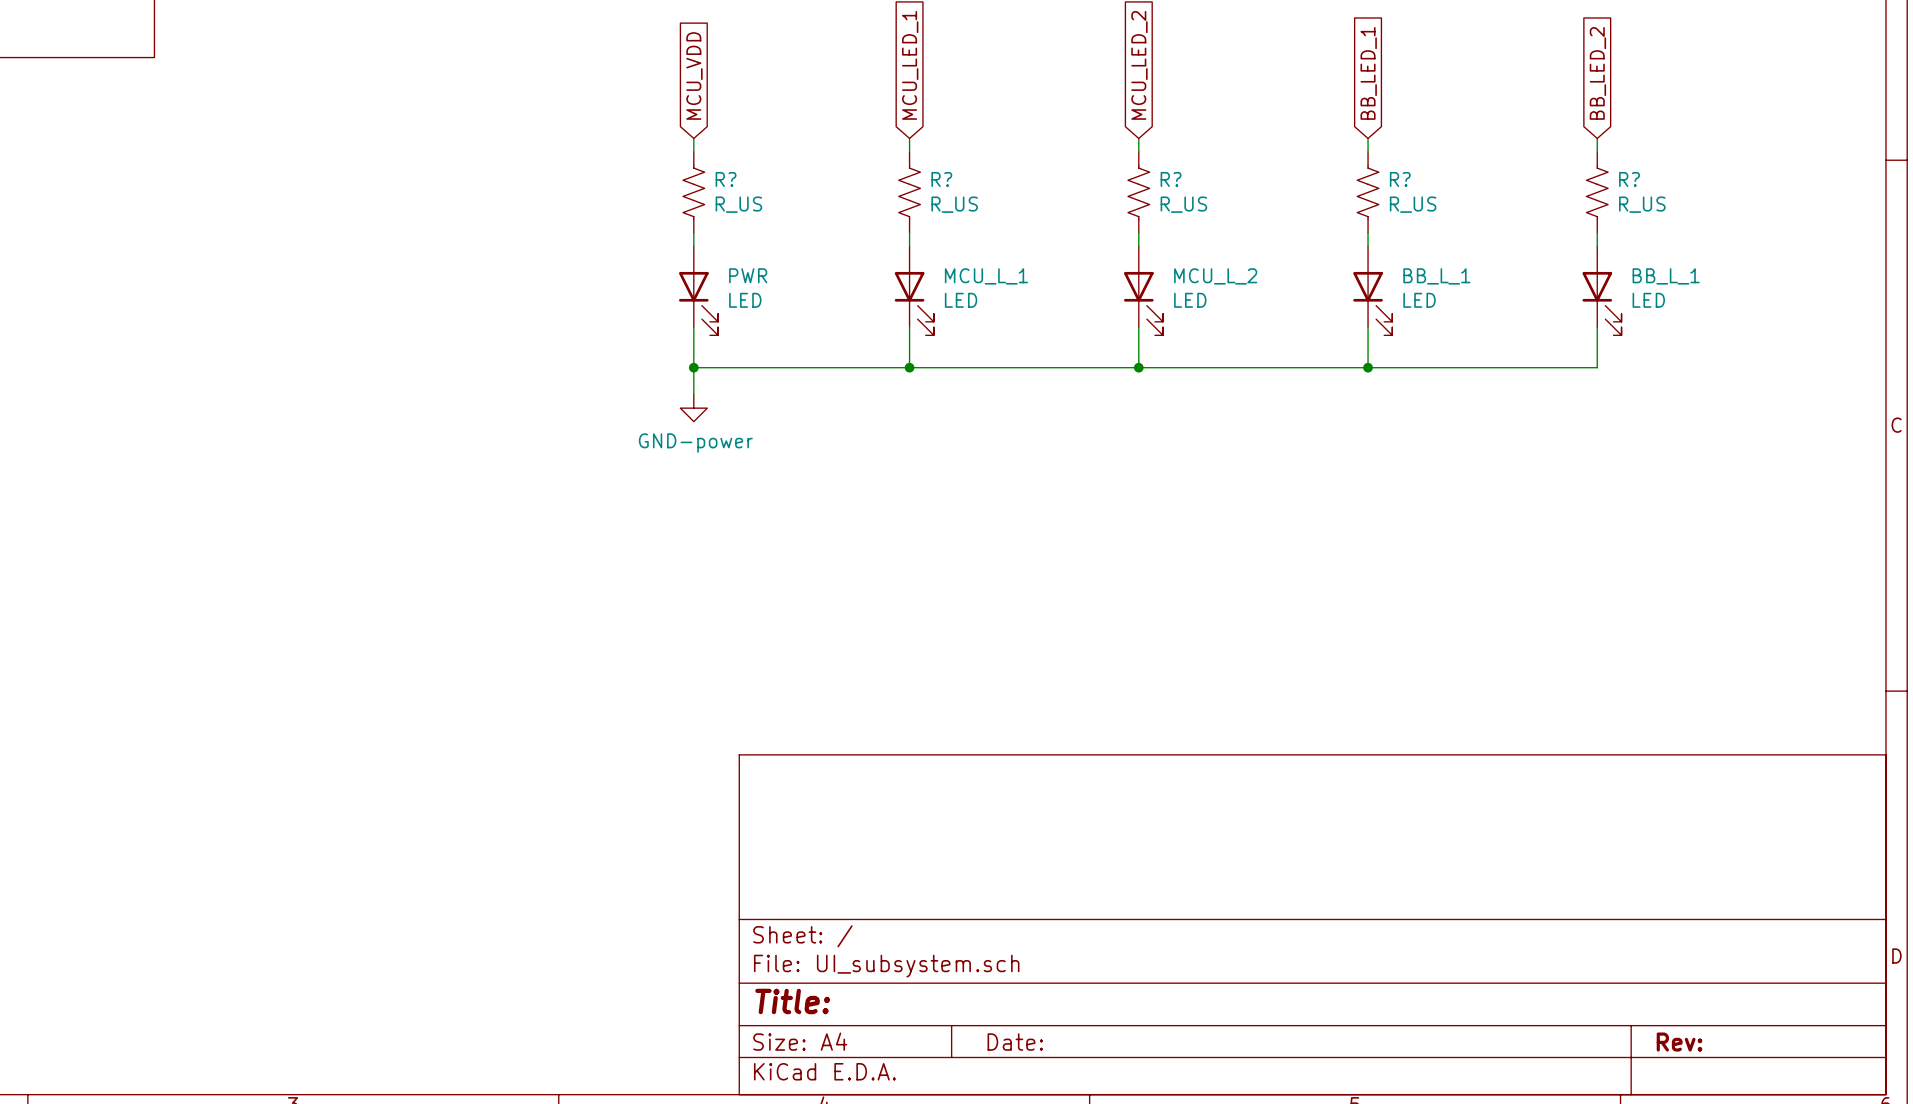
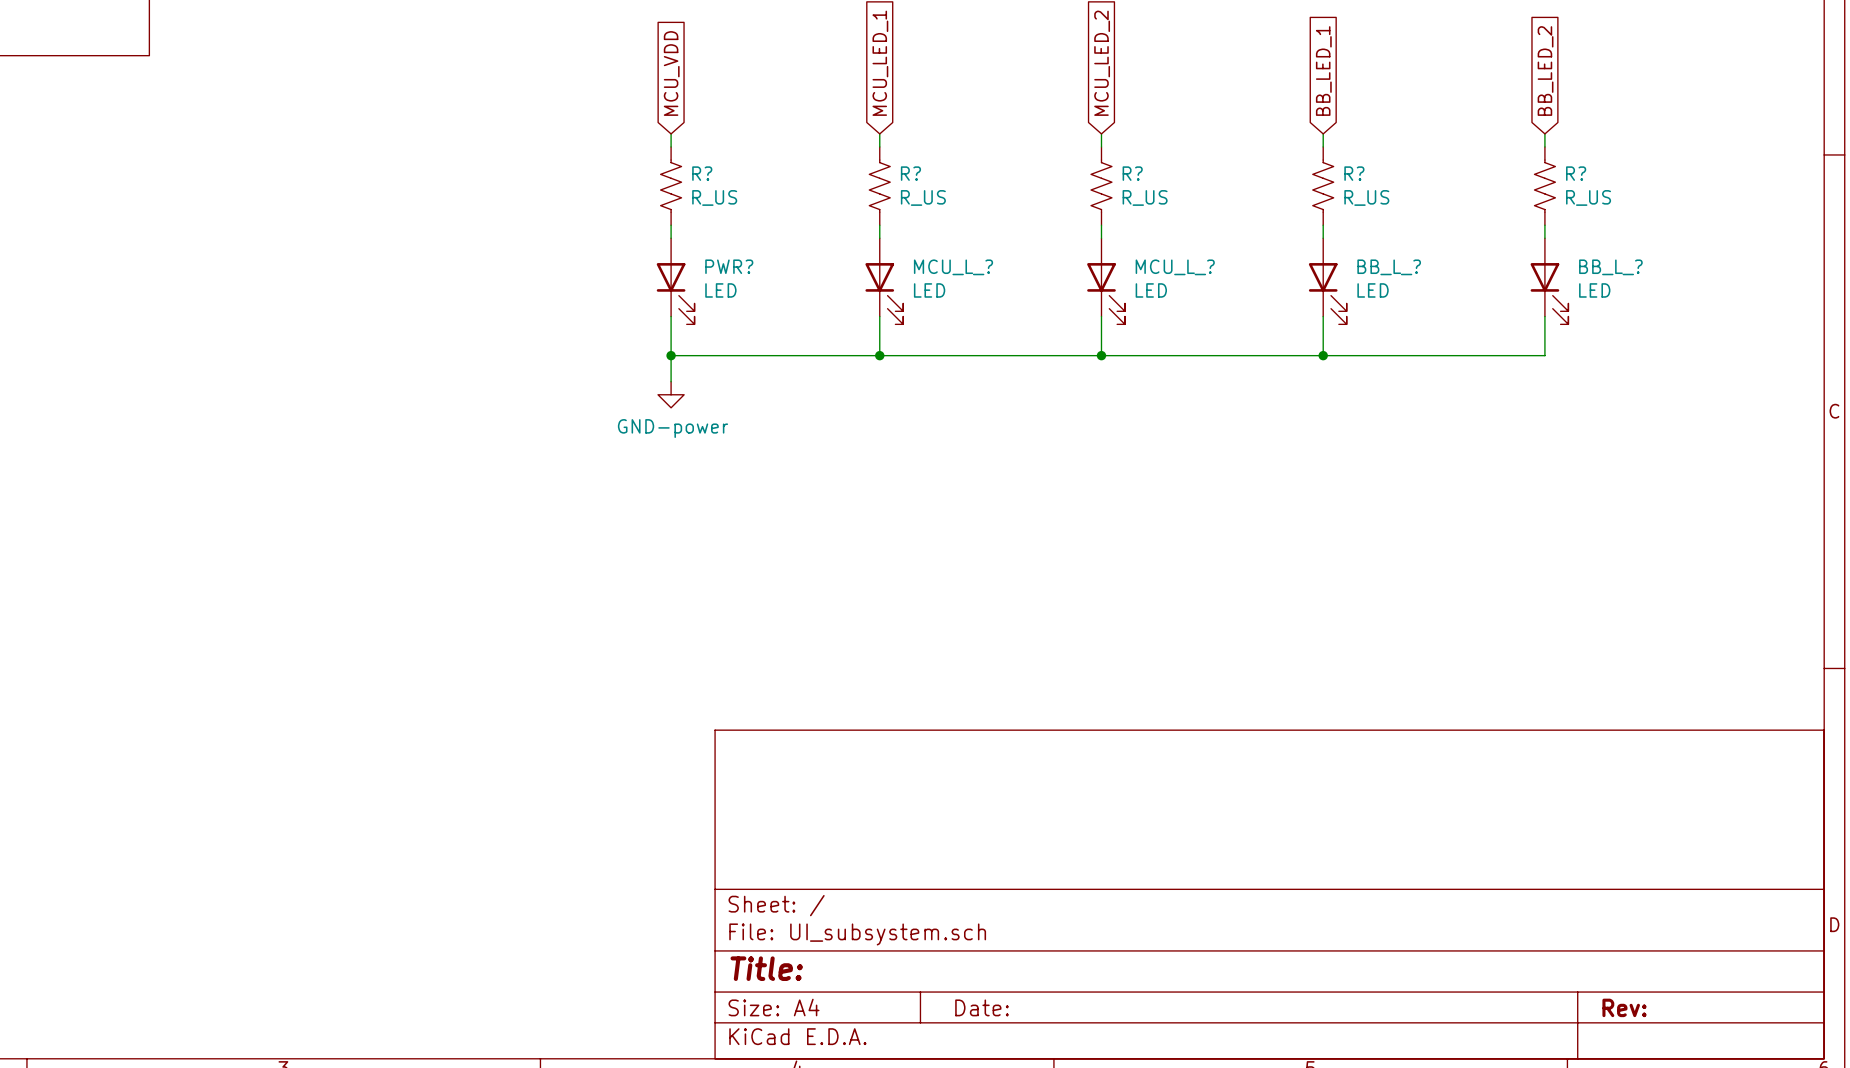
PWR name: PWR (748, 275) -> PWR? (729, 266)
MCU_L_1 name: MCU_L_1 (986, 276) -> MCU_L_? (953, 267)
MCU_L_2 name: MCU_L_2 (1215, 276) -> MCU_L_? (1175, 267)
BB_L_1 name: BB_L_1 (1436, 276) -> BB_L_? (1389, 267)
BB_L_1 name: BB_L_1 (1666, 276) -> BB_L_? (1610, 267)

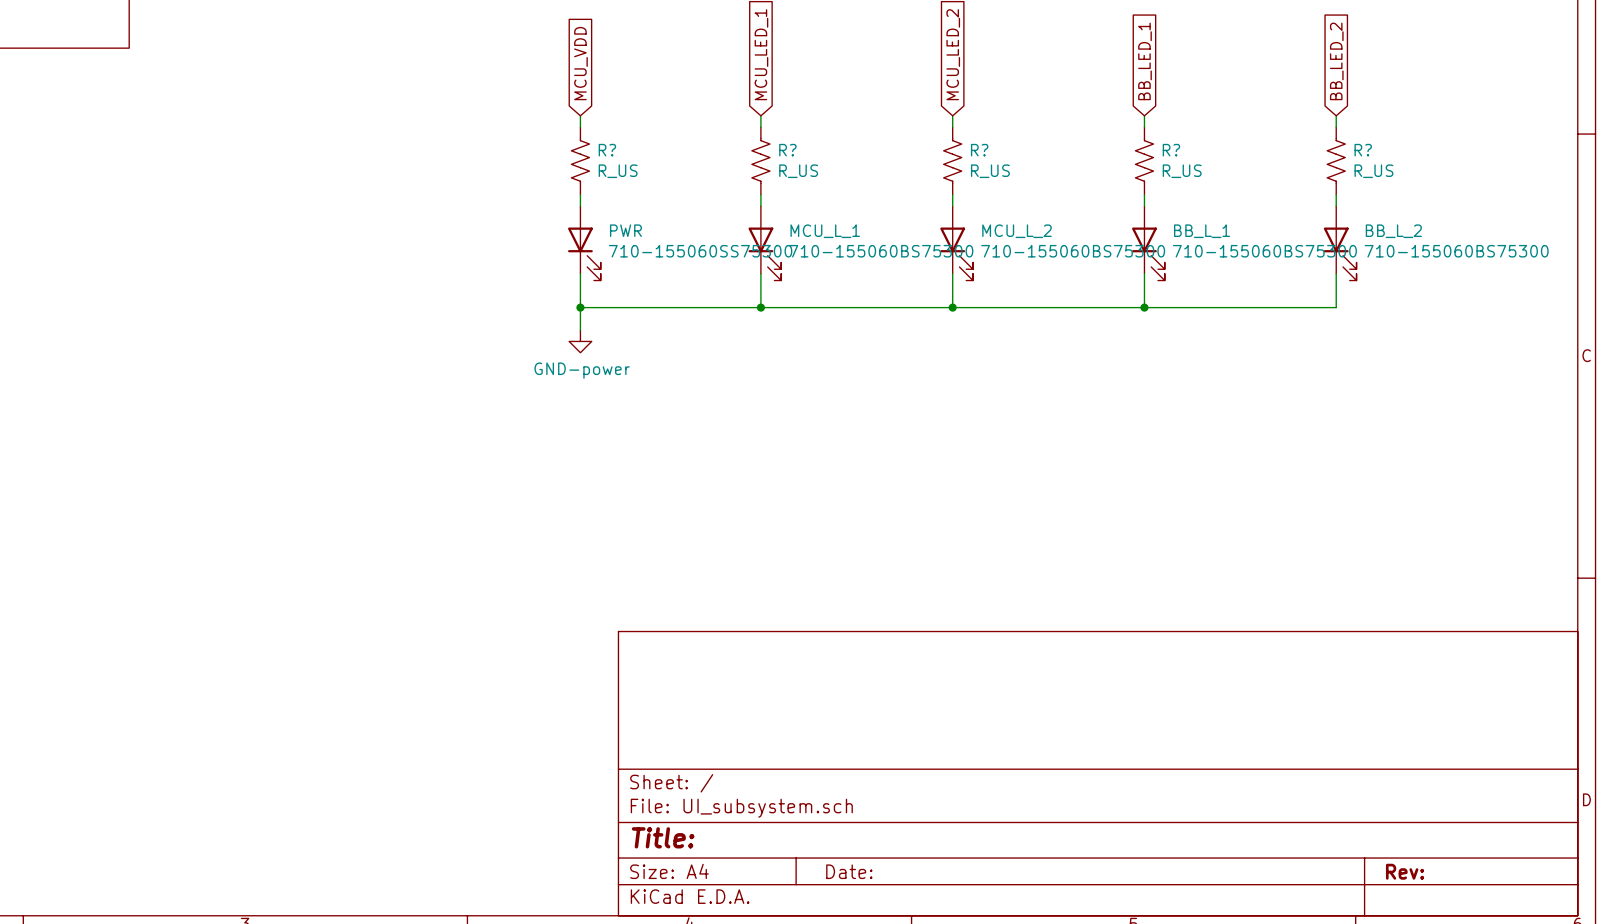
PWR? name: PWR? (729, 266) -> PWR (625, 230)
MCU_L_? name: MCU_L_? (953, 267) -> MCU_L_1 (825, 231)
MCU_L_? name: MCU_L_? (1175, 267) -> MCU_L_2 (1017, 231)
BB_L_? name: BB_L_? (1389, 267) -> BB_L_1 (1202, 231)
BB_L_? name: BB_L_? (1610, 267) -> BB_L_2 (1393, 231)
PWR? value: LED (720, 290) -> 710-155060SS75300 (700, 251)
MCU_L_? value: LED (929, 290) -> 710-155060BS75300 (881, 251)
MCU_L_? value: LED (1151, 290) -> 710-155060BS75300 (1073, 251)
BB_L_? value: LED (1373, 290) -> 710-155060BS75300 (1264, 251)
BB_L_? value: LED (1594, 290) -> 710-155060BS75300 (1456, 251)

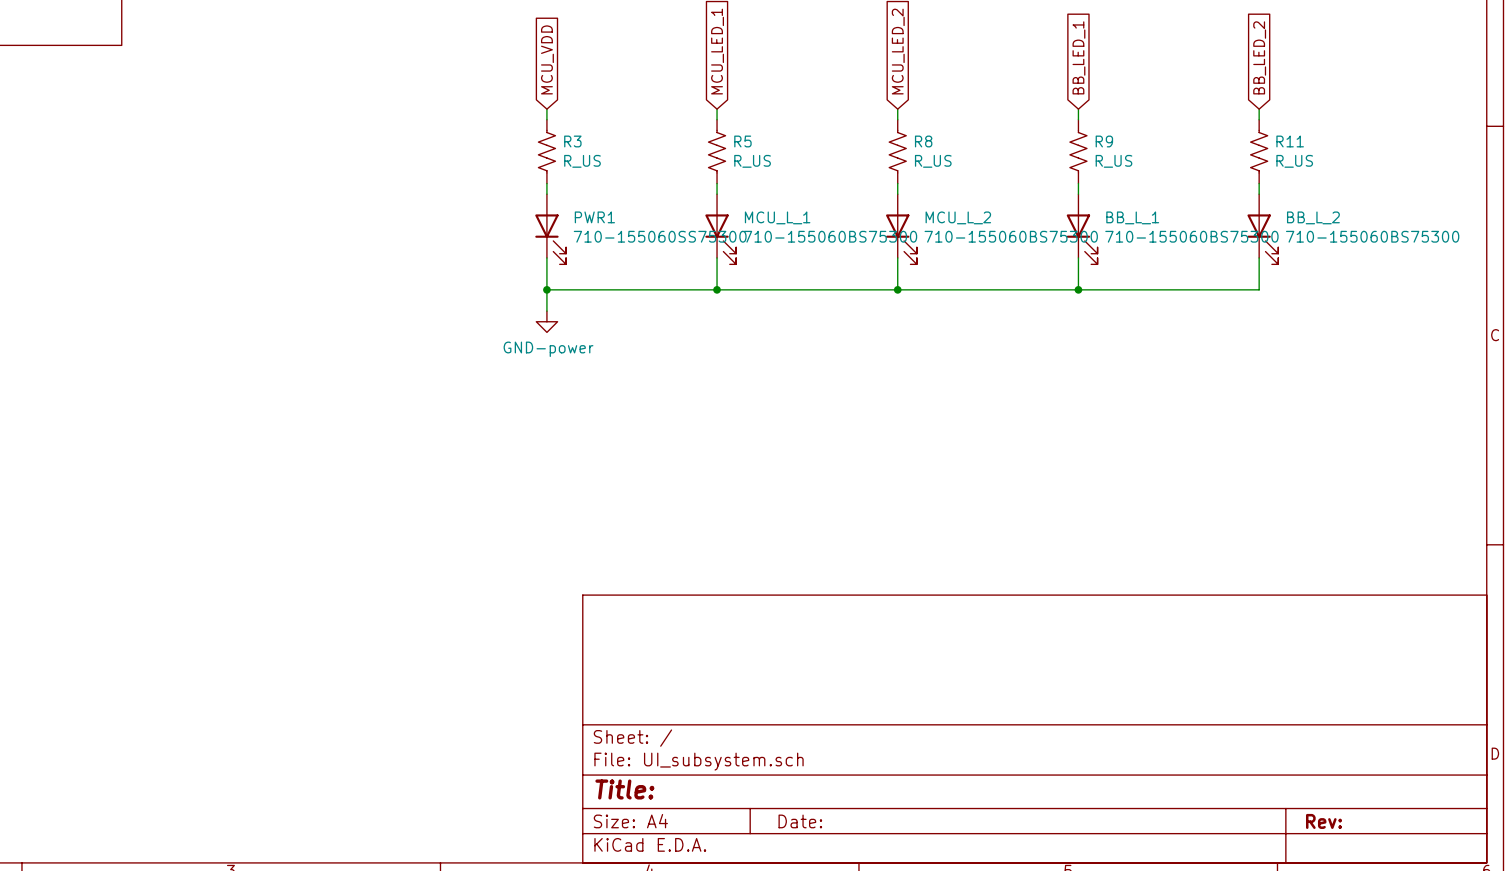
R? name: R? (607, 150) -> R3 (572, 141)
R? name: R? (787, 150) -> R5 (742, 141)
R? name: R? (979, 150) -> R8 (923, 141)
R? name: R? (1171, 150) -> R9 (1104, 141)
R? name: R? (1363, 150) -> R11 (1290, 141)
PWR name: PWR (625, 230) -> PWR1 (594, 217)

